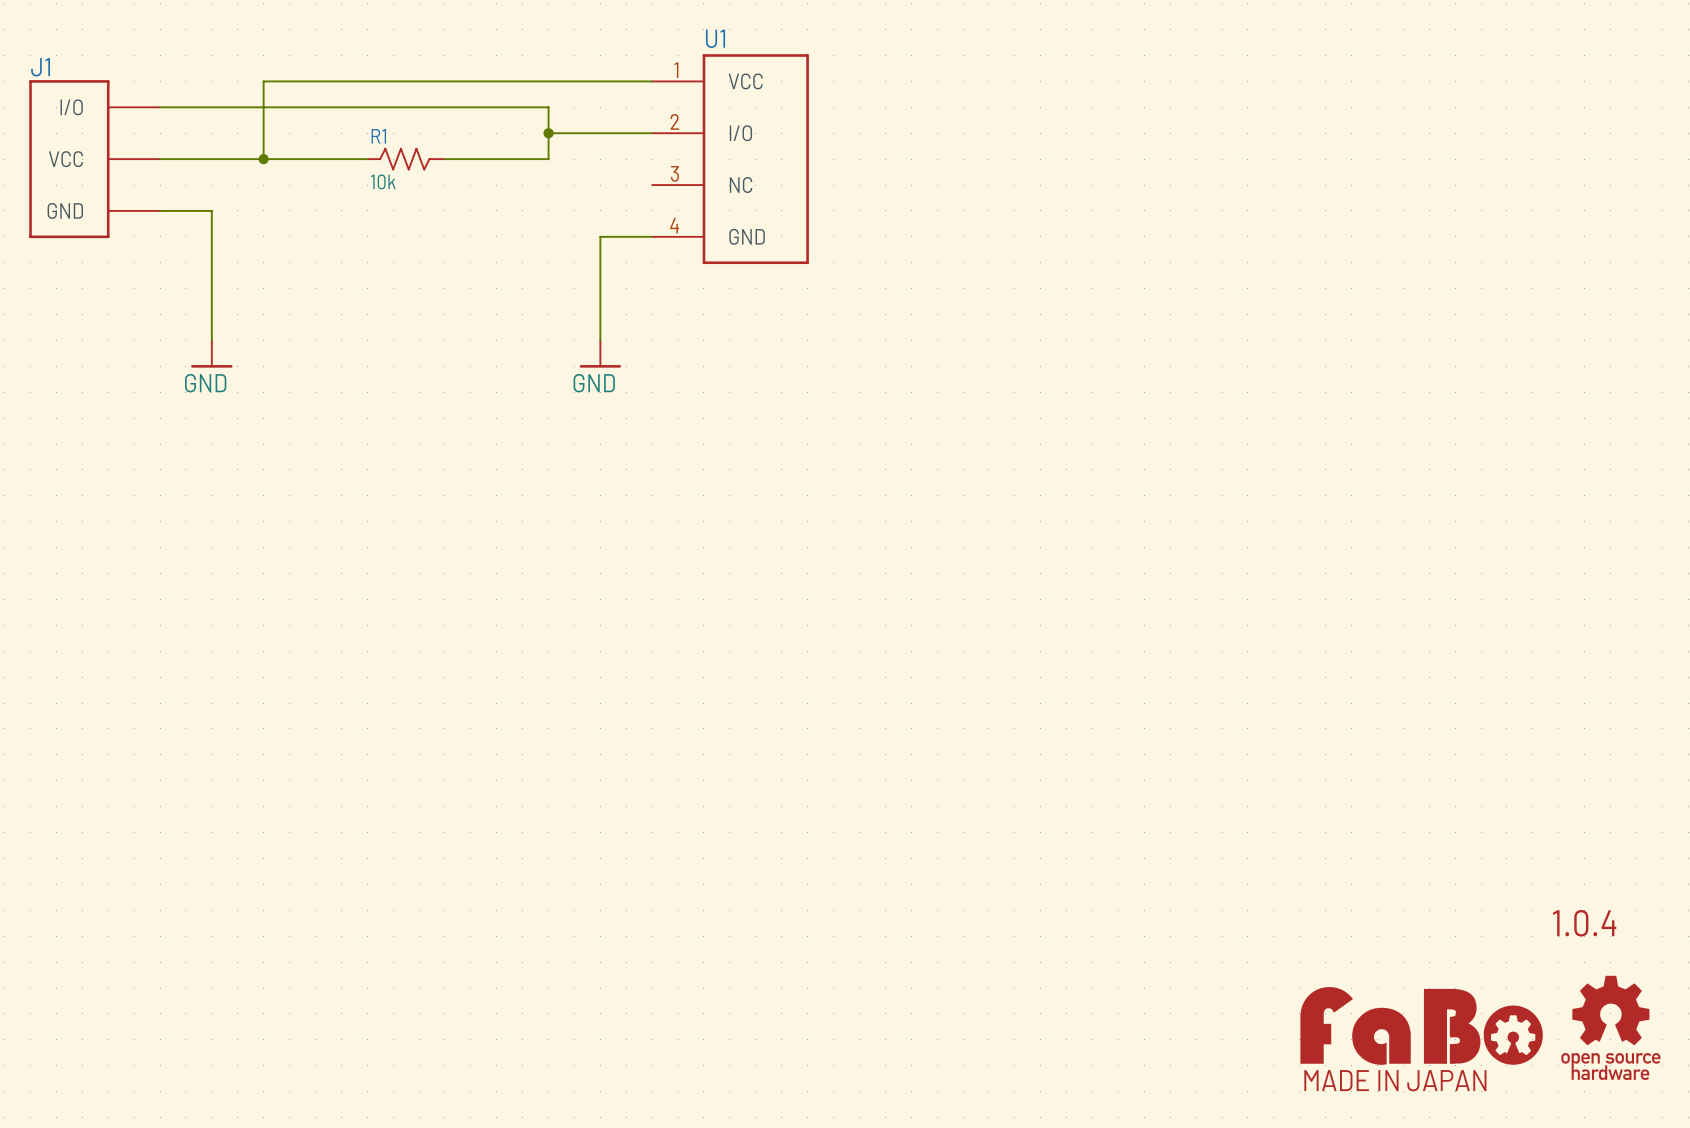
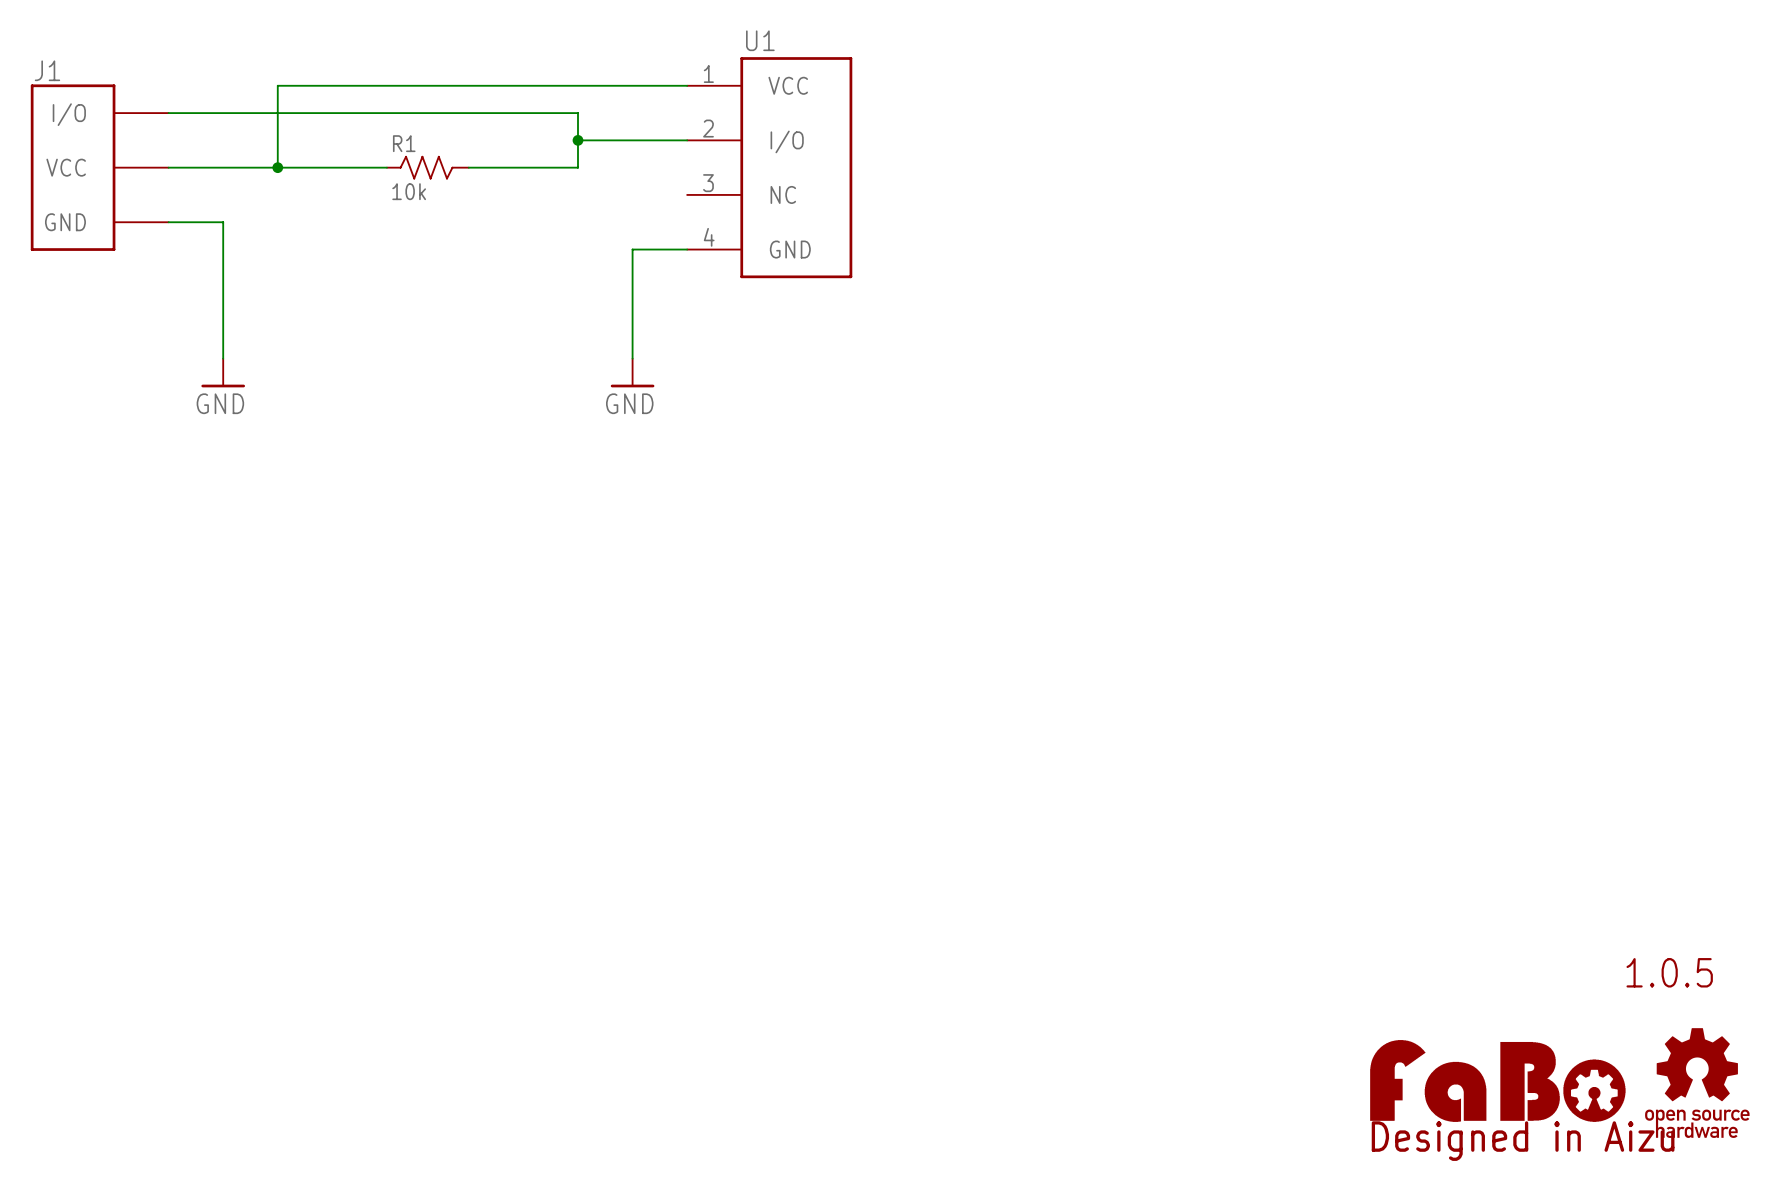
text: 1.0.4 (1584, 923) -> 1.0.5 (1669, 972)
part text: MADE IN JAPAN (1395, 1080) -> none
part text: none -> Designed in Aizu (1523, 1141)

